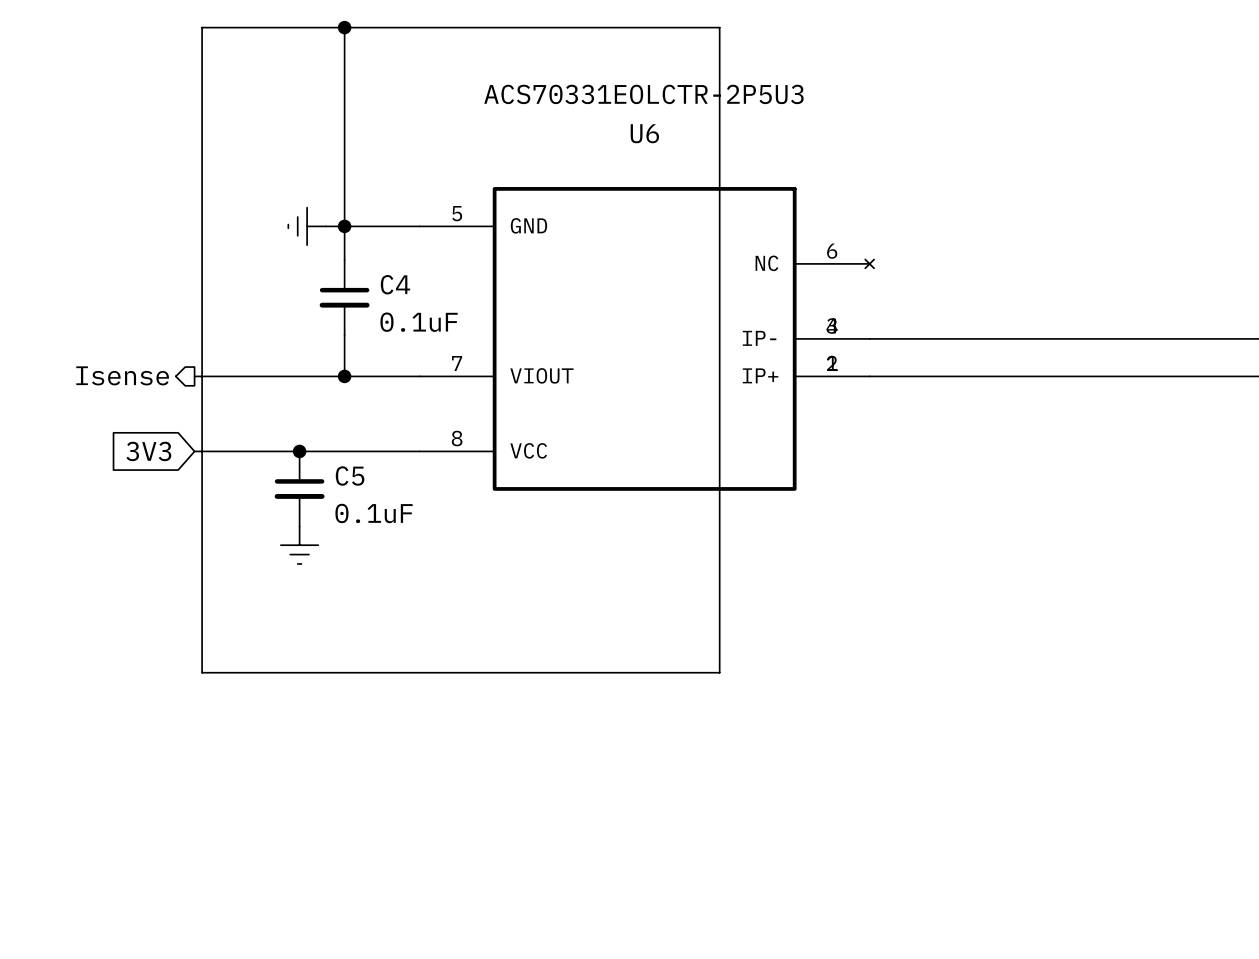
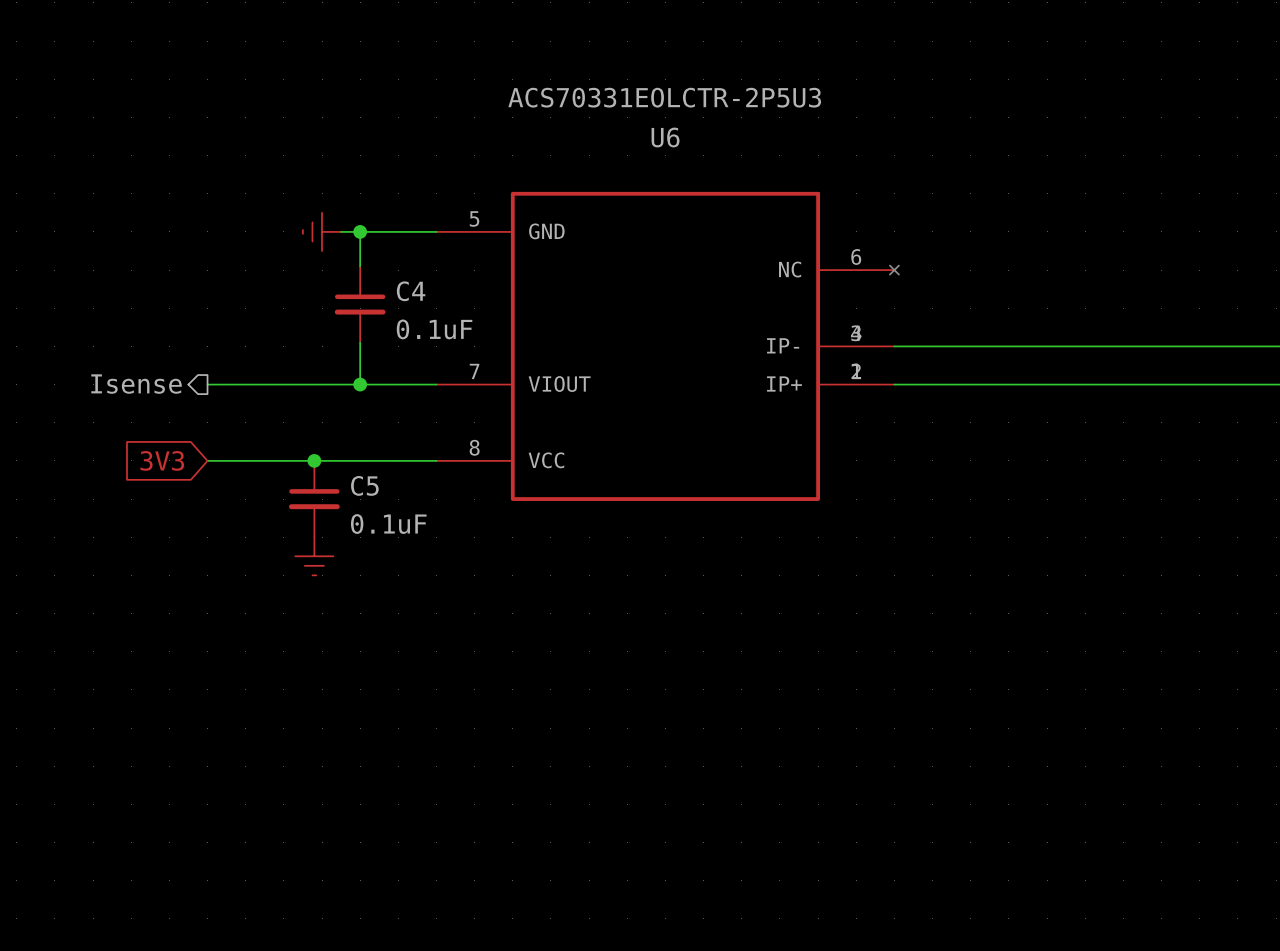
wire: (202, 27) (202, 672) (719, 672) (719, 27) (202, 27) -> none
wire: (344, 27) (344, 226) -> none
junction: (344, 27) -> none

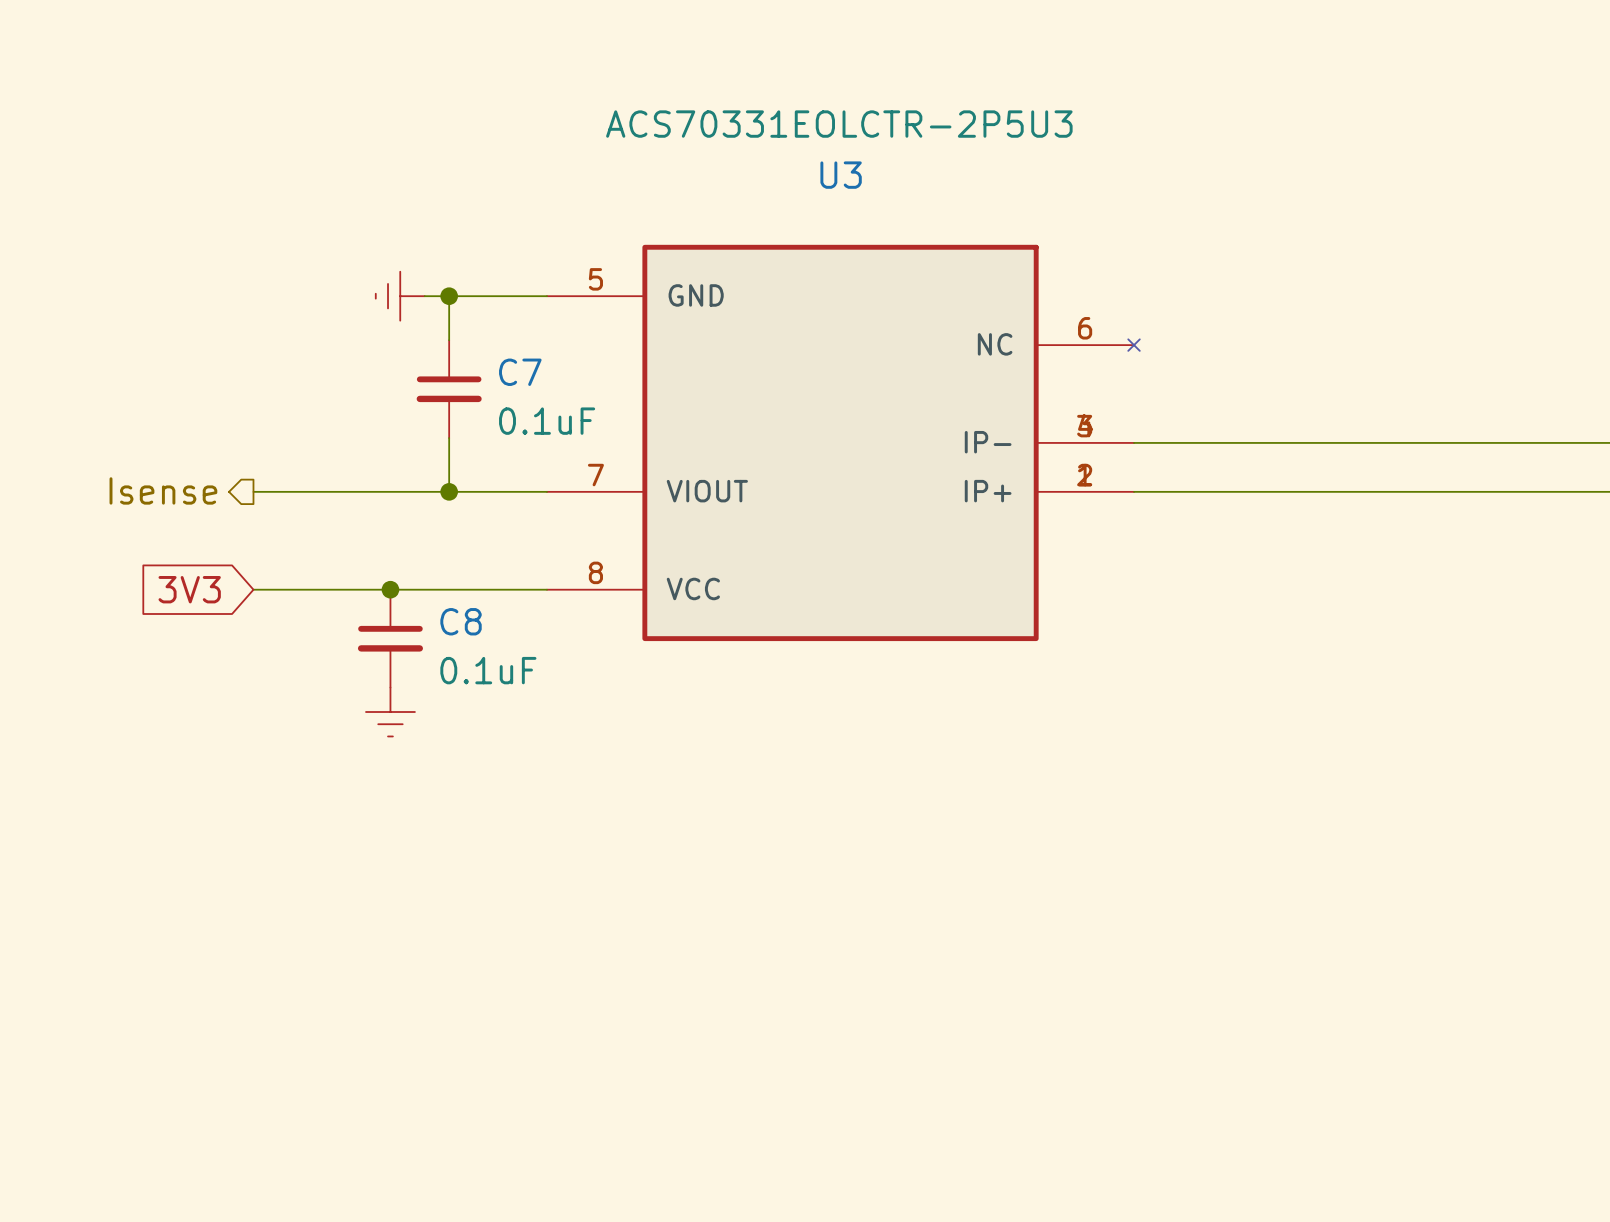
U6 name: U6 (665, 137) -> U3 (841, 175)
C4 name: C4 (411, 291) -> C7 (520, 372)
C5 name: C5 (364, 485) -> C8 (461, 621)

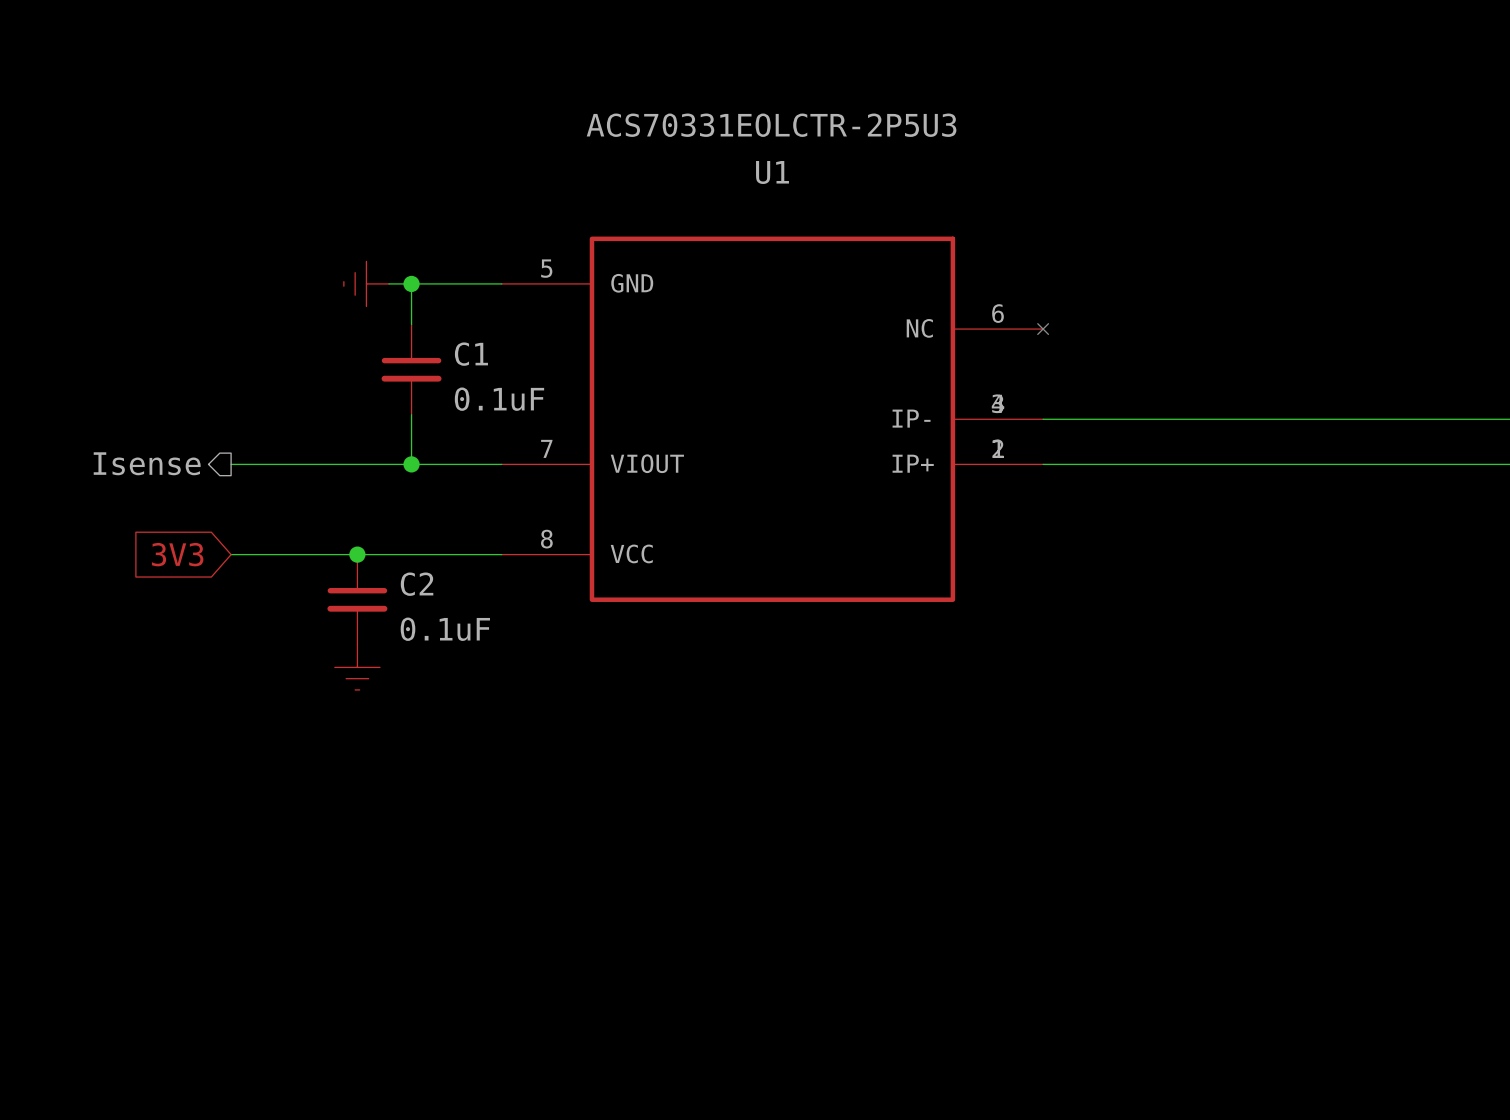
U3 name: U3 (841, 175) -> U1 (772, 172)
C7 name: C7 (520, 372) -> C1 (471, 354)
C8 name: C8 (461, 621) -> C2 (417, 584)

